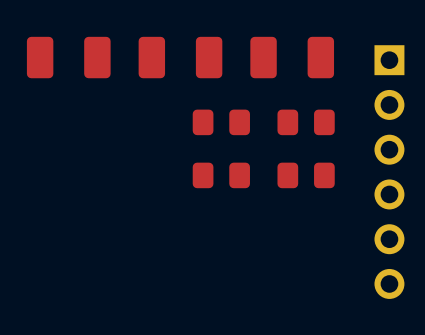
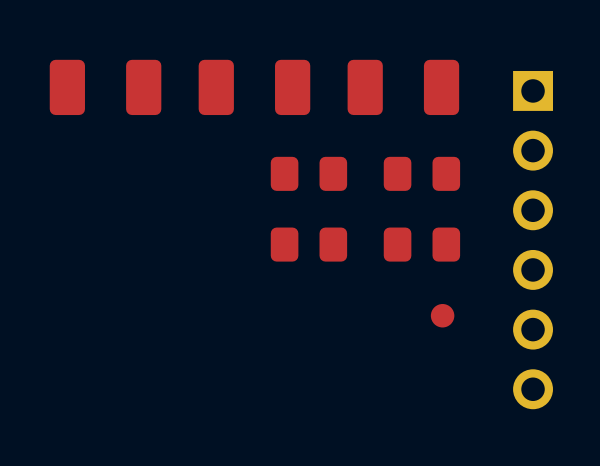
part: none -> (442, 315)

